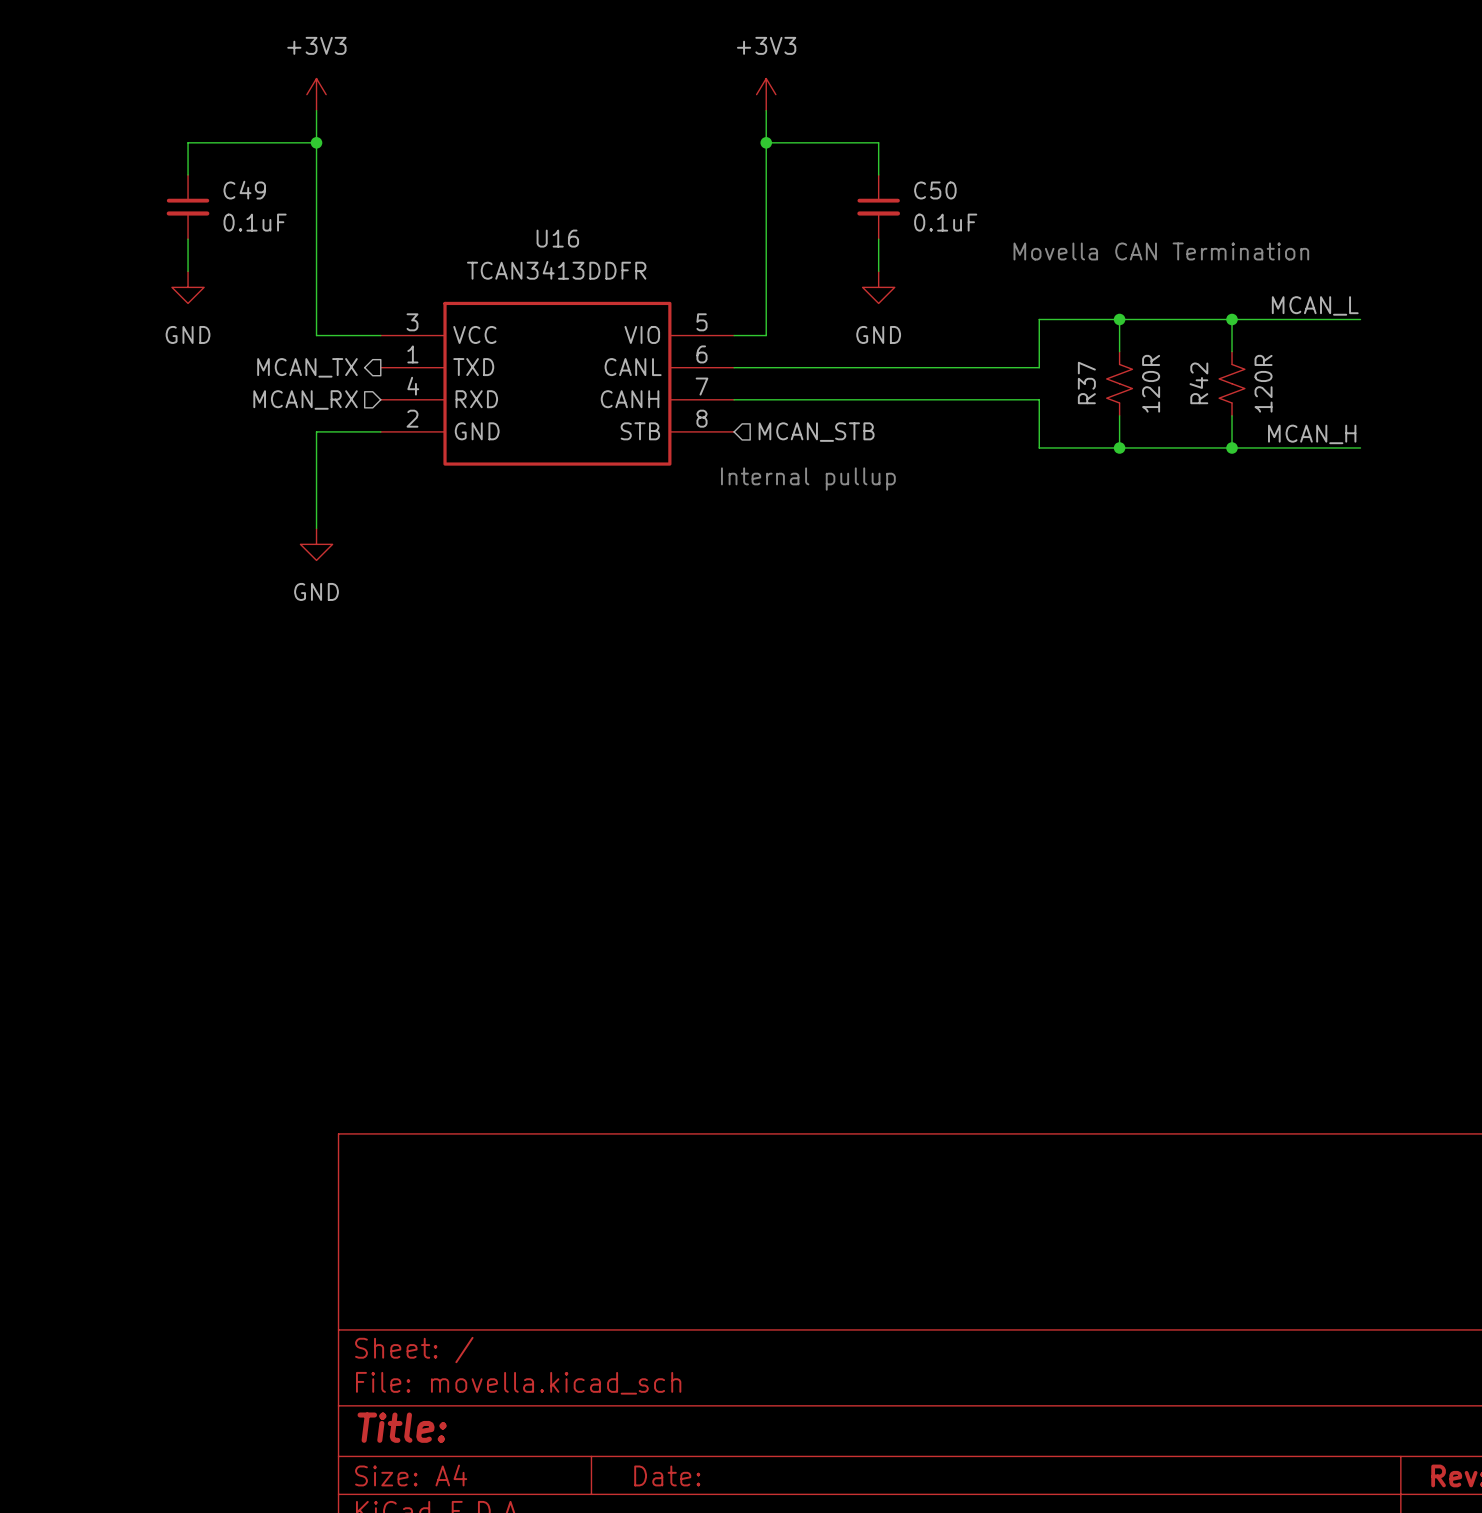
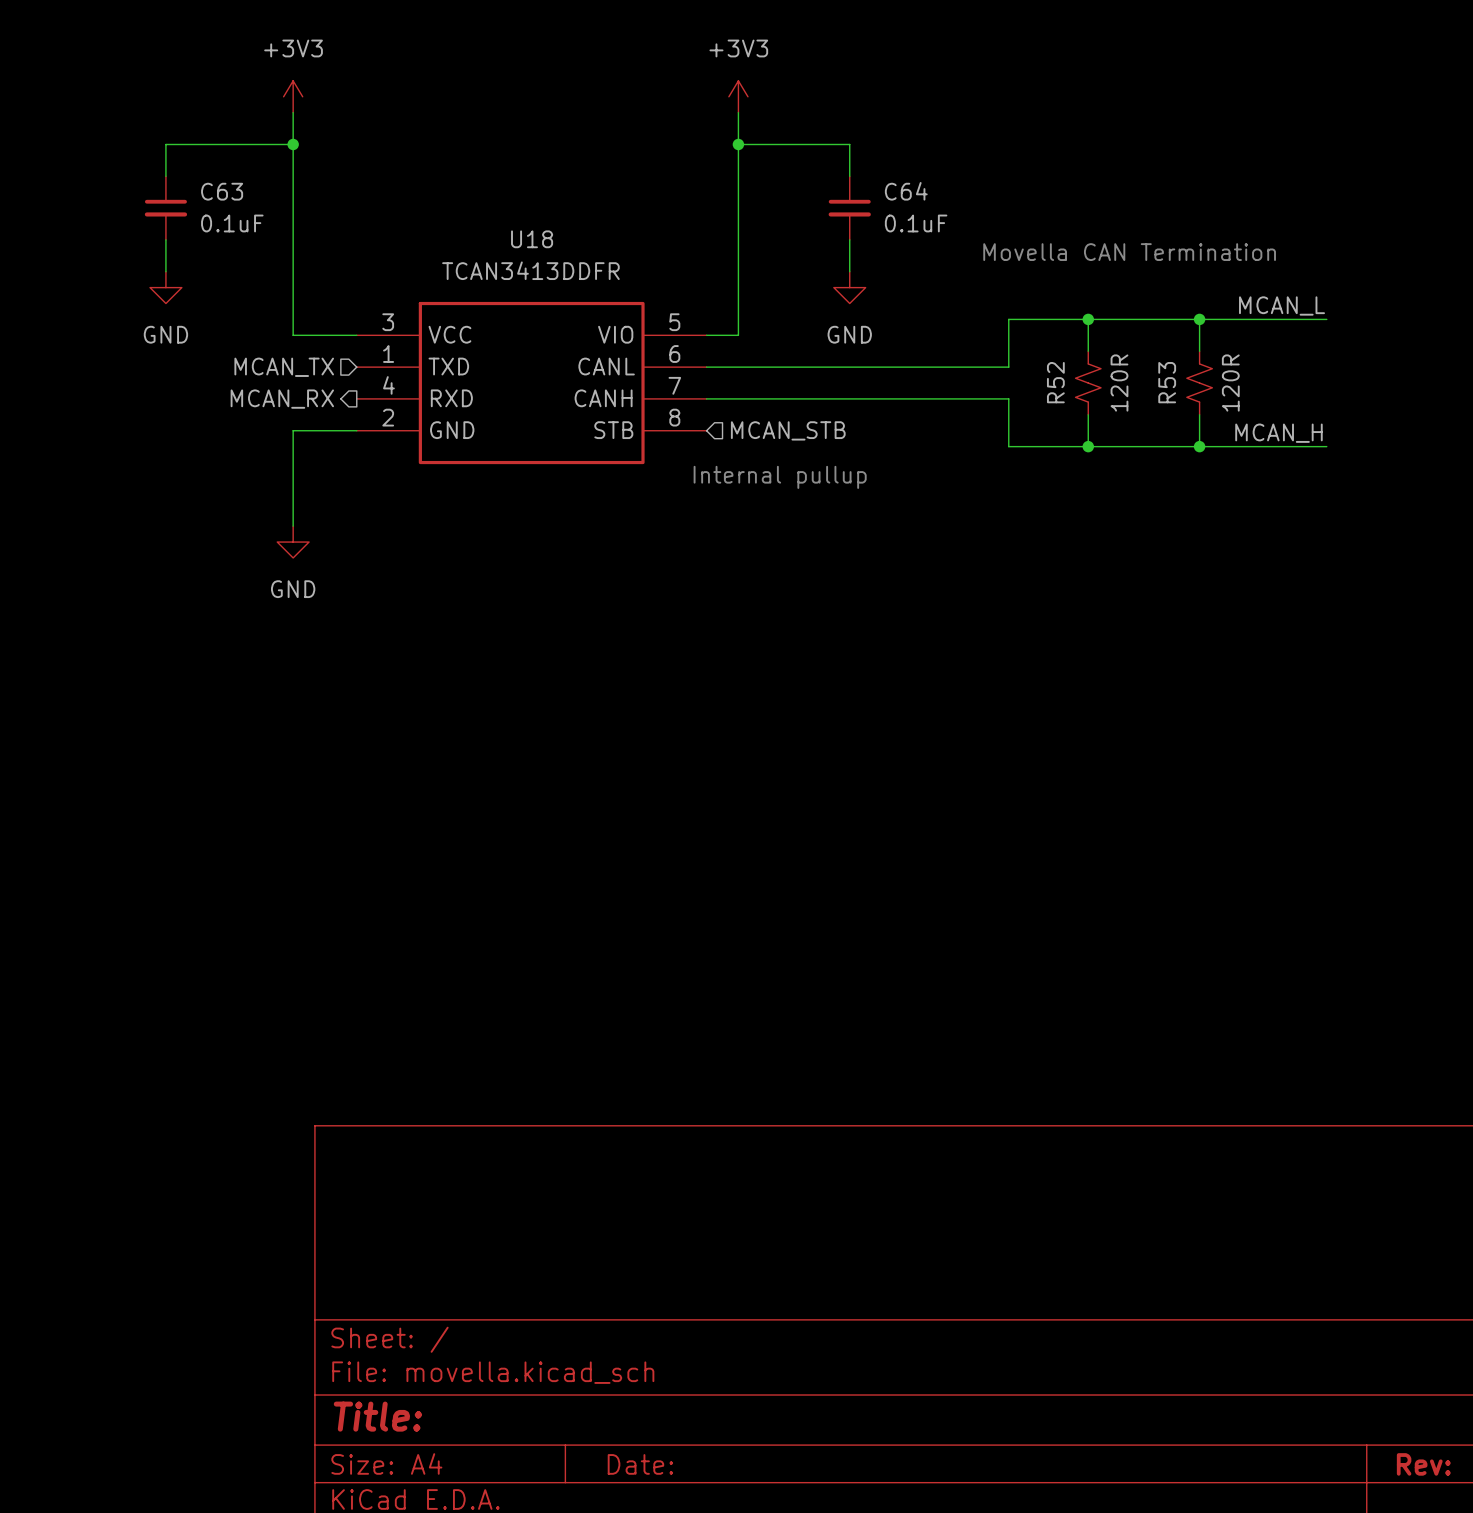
C49 name: C49 (244, 190) -> C63 (222, 191)
C50 name: C50 (935, 190) -> C64 (906, 191)
U16 name: U16 (557, 238) -> U18 (532, 239)
hierarchical label shape: output (307, 367) -> input (284, 367)
R37 name: R37 (1086, 382) -> R52 (1055, 382)
R42 name: R42 (1198, 383) -> R53 (1167, 382)
hierarchical label shape: input (305, 399) -> output (282, 399)

